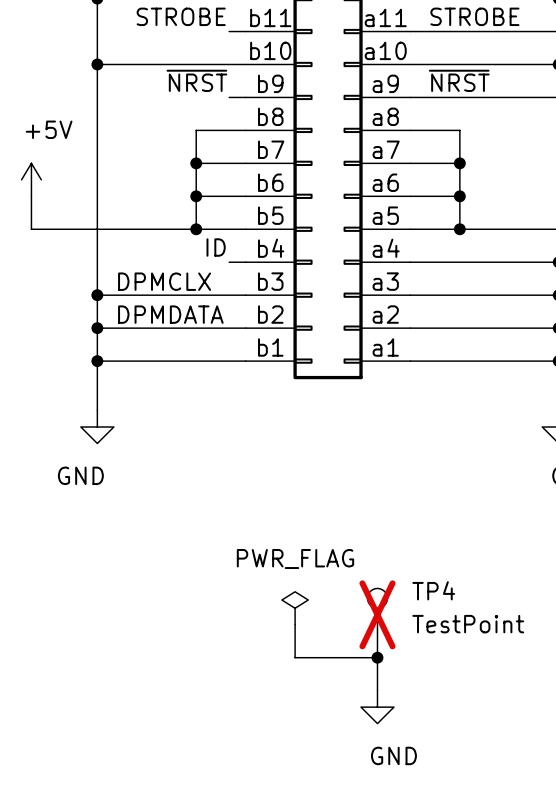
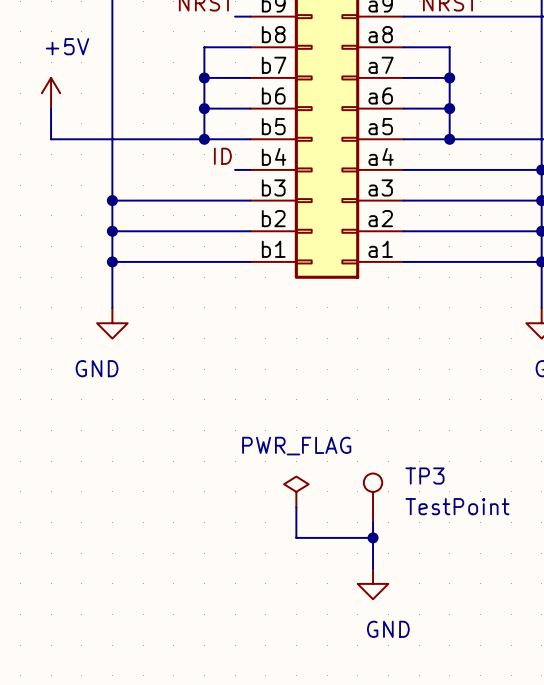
text: DPMCLX (164, 281) -> none
text: DPMDATA (170, 314) -> none
TP4 name: TP4 (433, 590) -> TP3 (424, 476)
TP4 do-not-place cross: (377, 614) -> none

